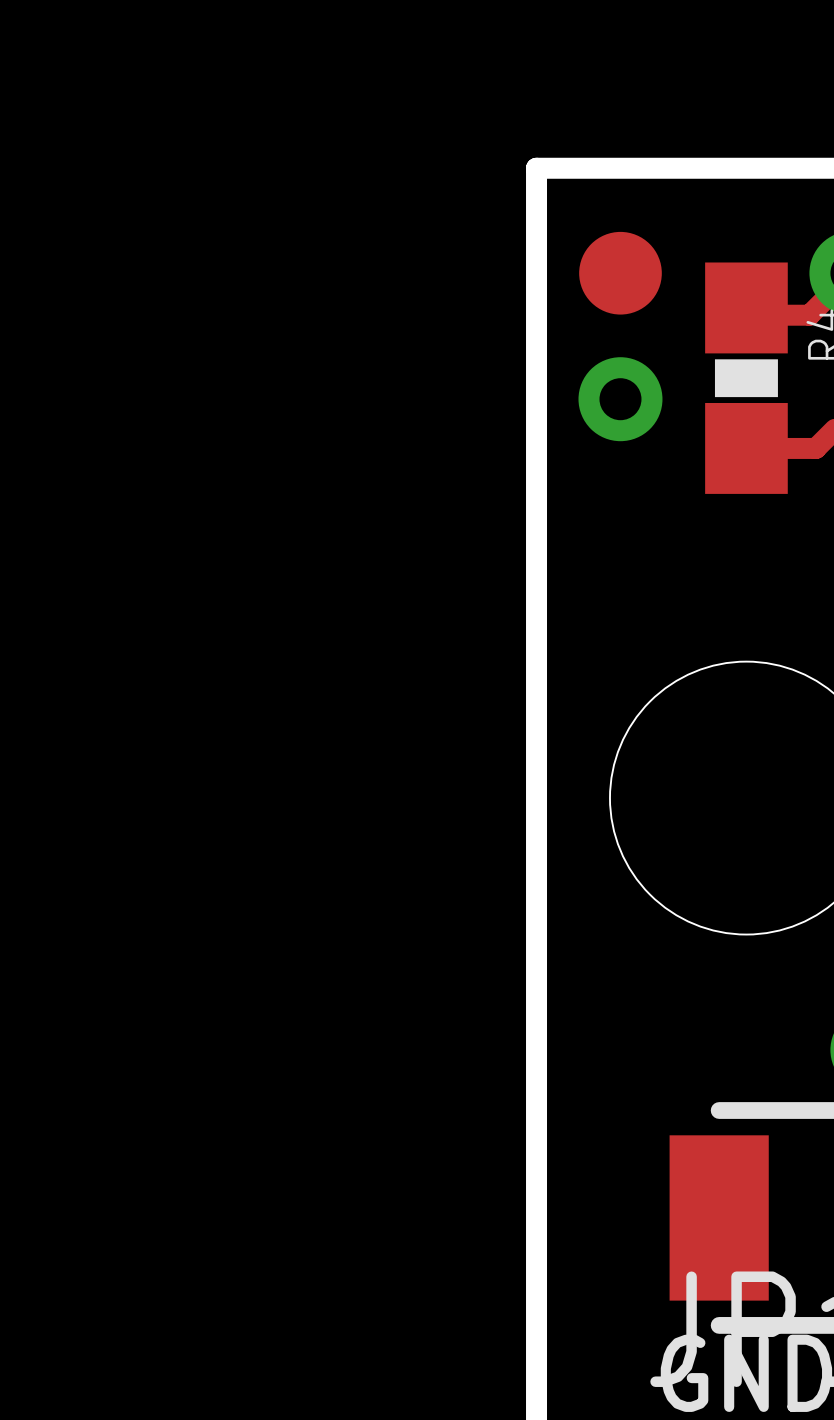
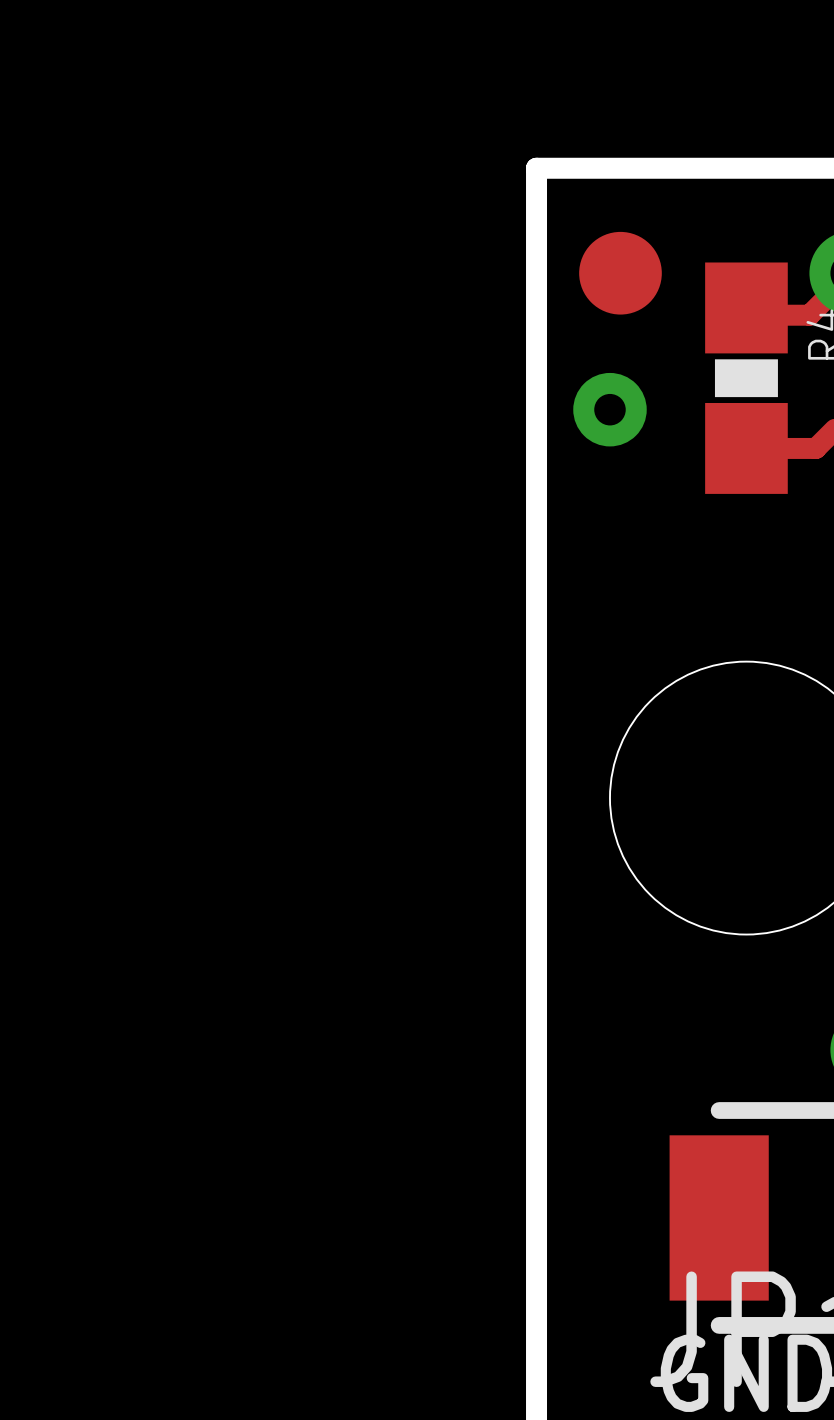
via size: [578, 357, 663, 442] -> [573, 372, 647, 447]

